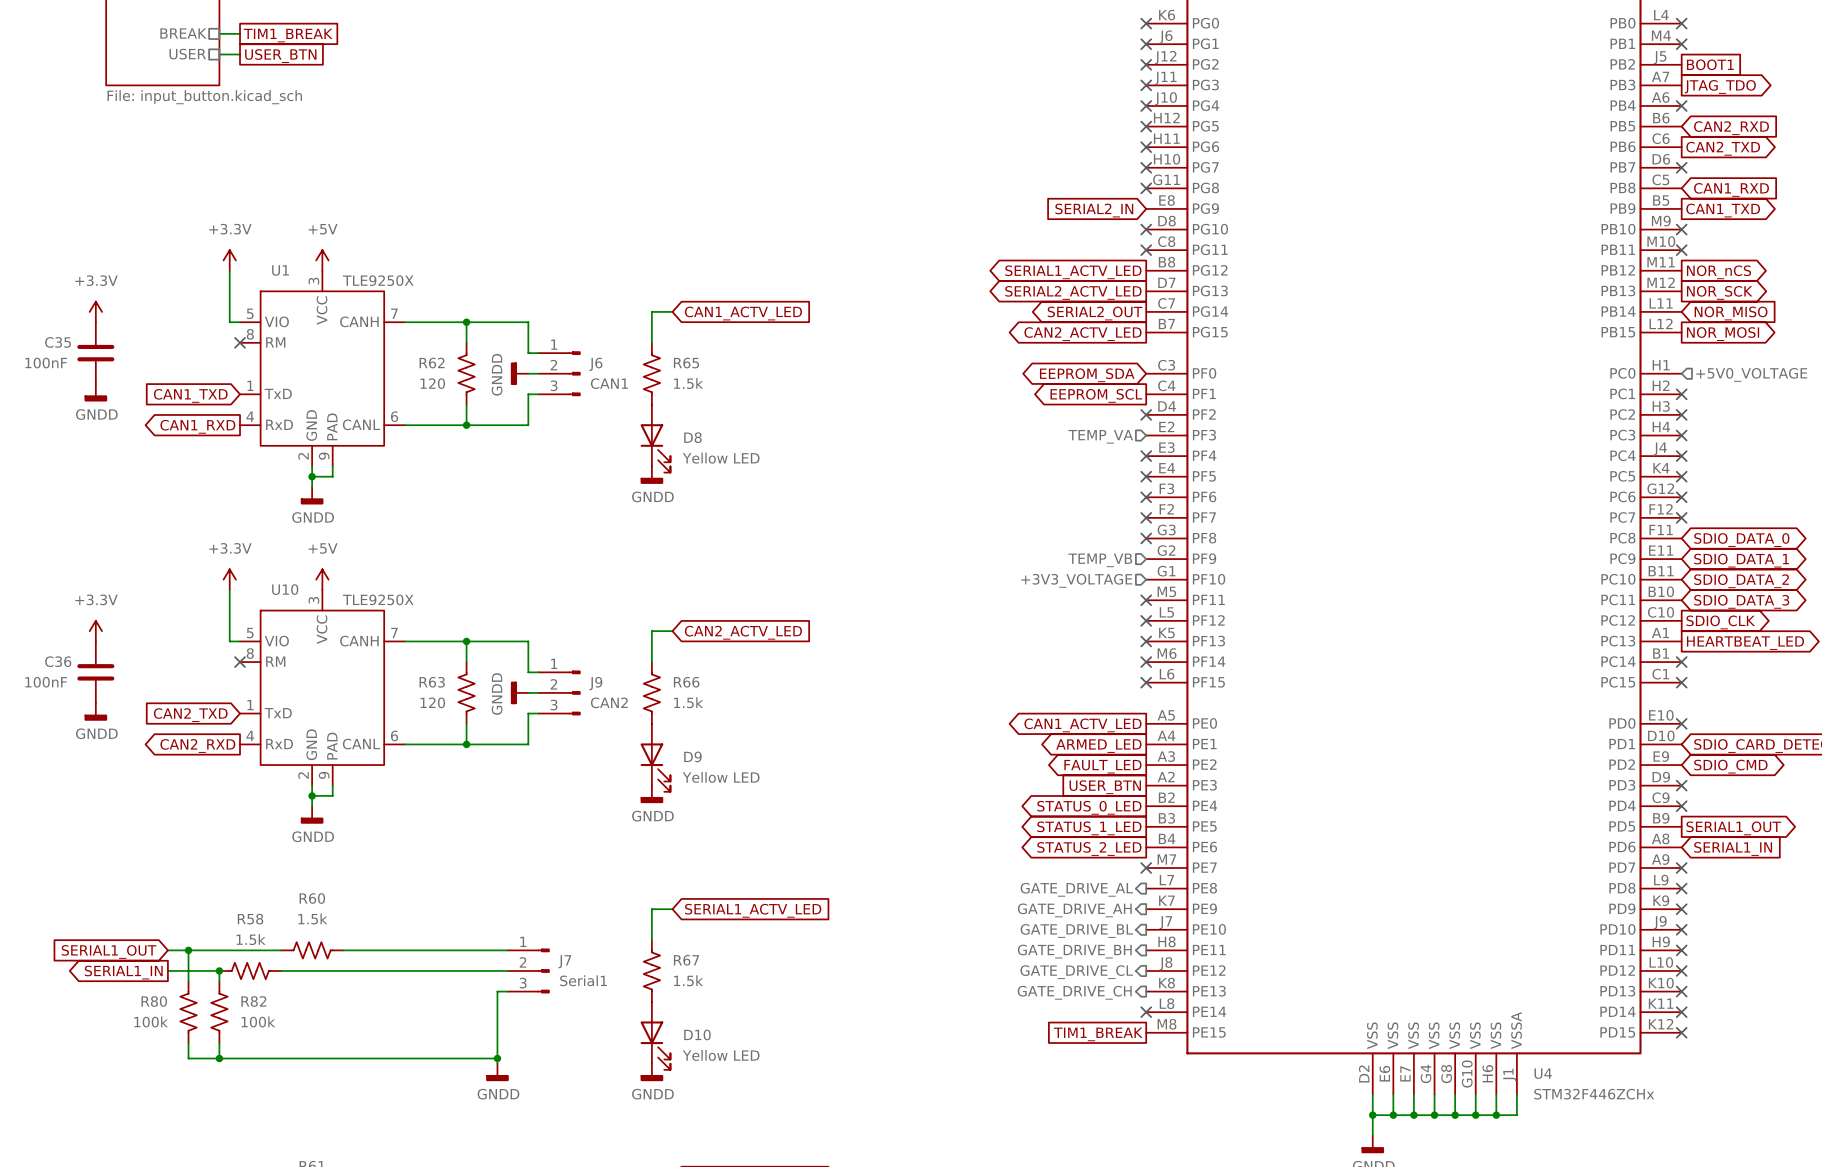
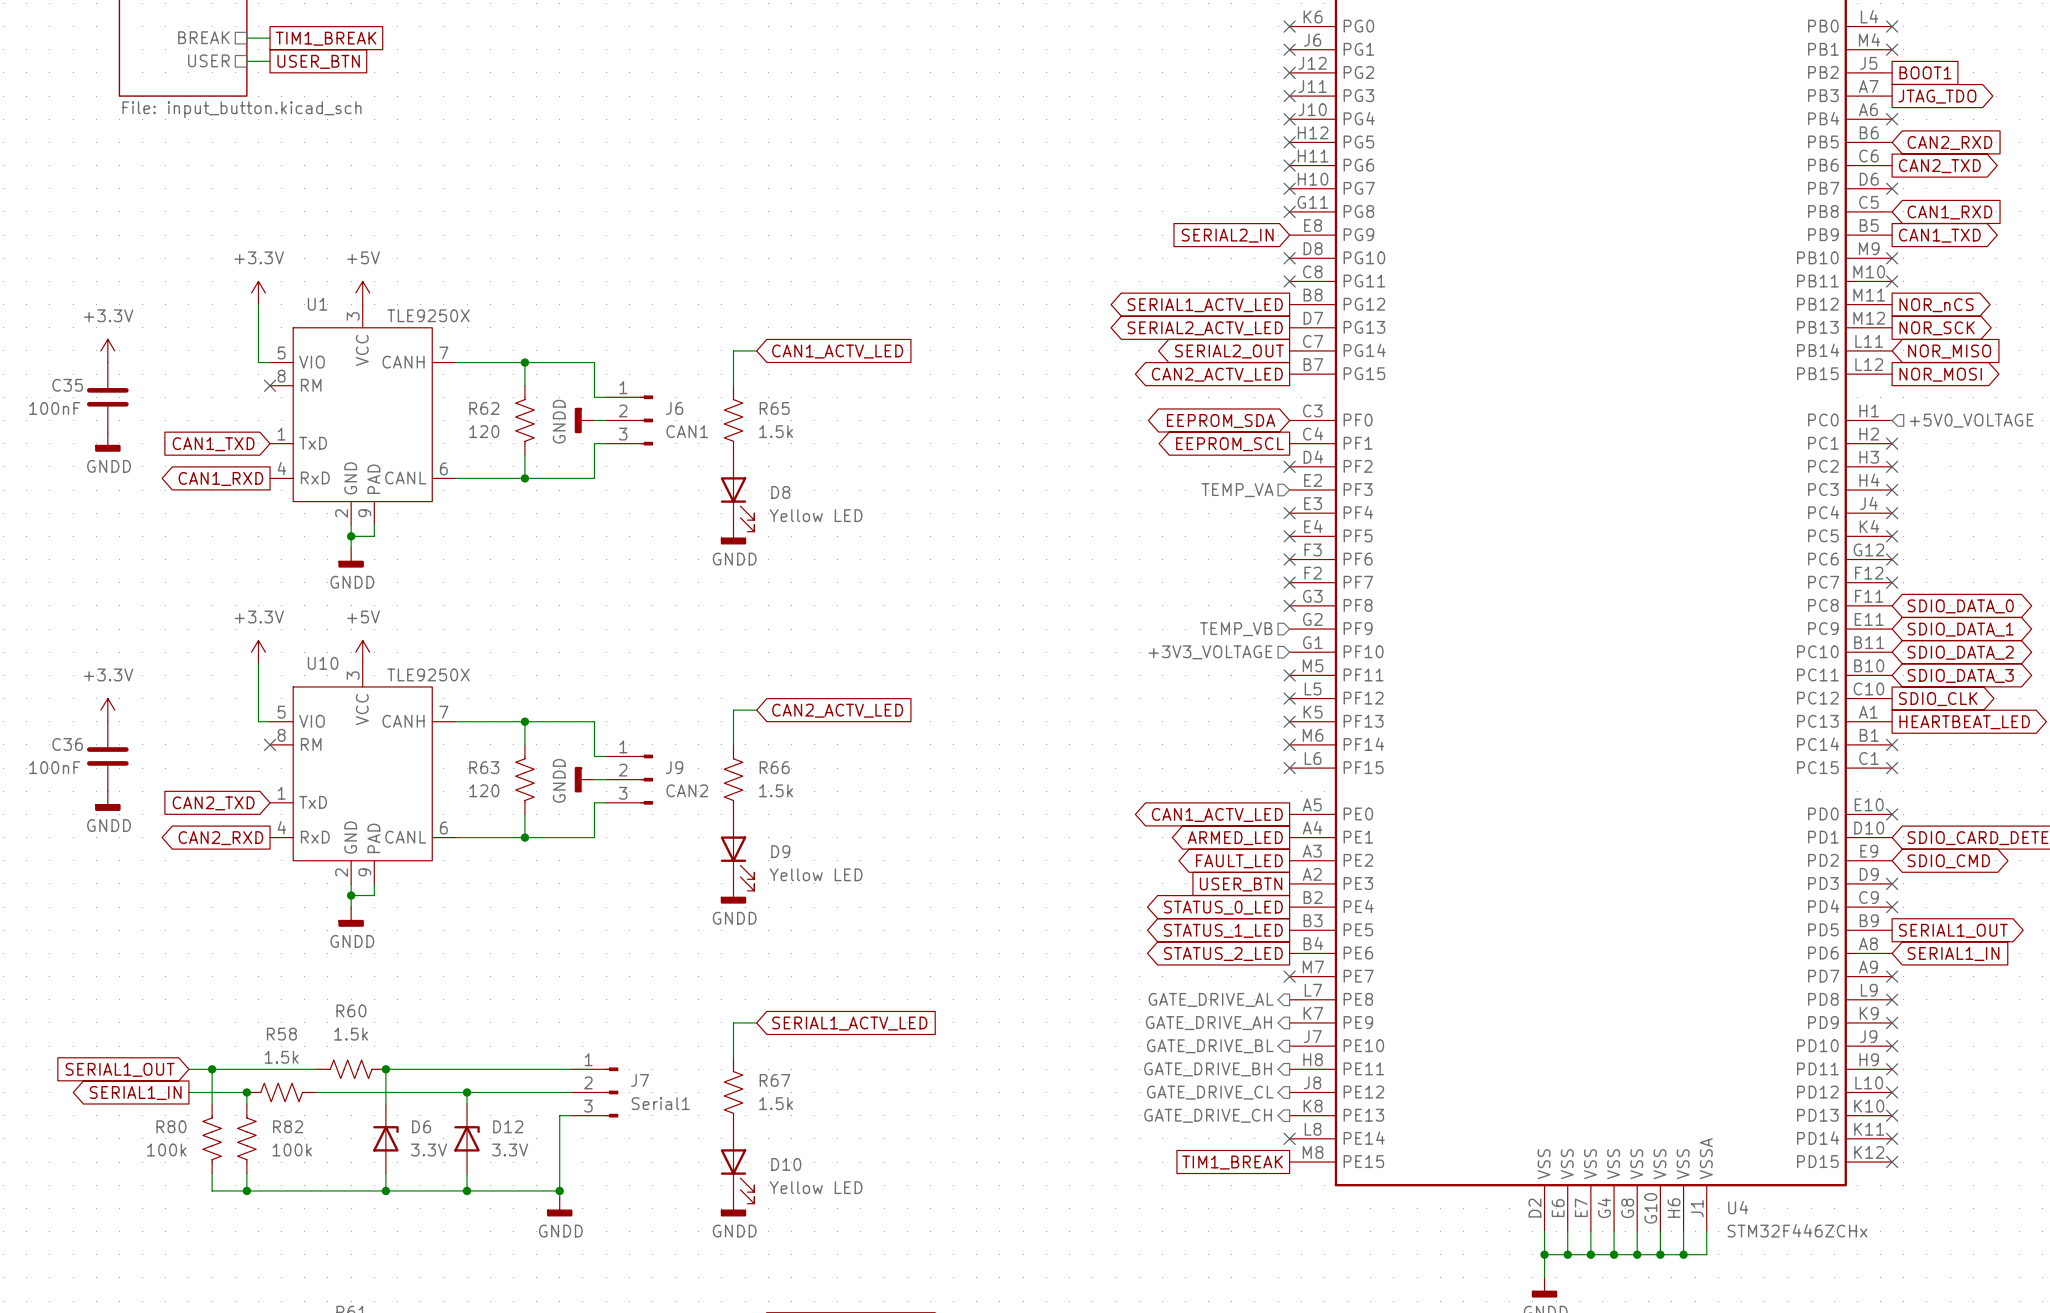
wire: none -> (385, 1069) (385, 1104)
junction: none -> (385, 1069)
wire: none -> (467, 1092) (467, 1104)
junction: none -> (467, 1092)
D6: none -> 3.3V (385, 1138)
D12: none -> 3.3V (467, 1138)
wire: none -> (385, 1173) (385, 1190)
wire: none -> (467, 1173) (467, 1190)
junction: none -> (385, 1190)
junction: none -> (467, 1190)

